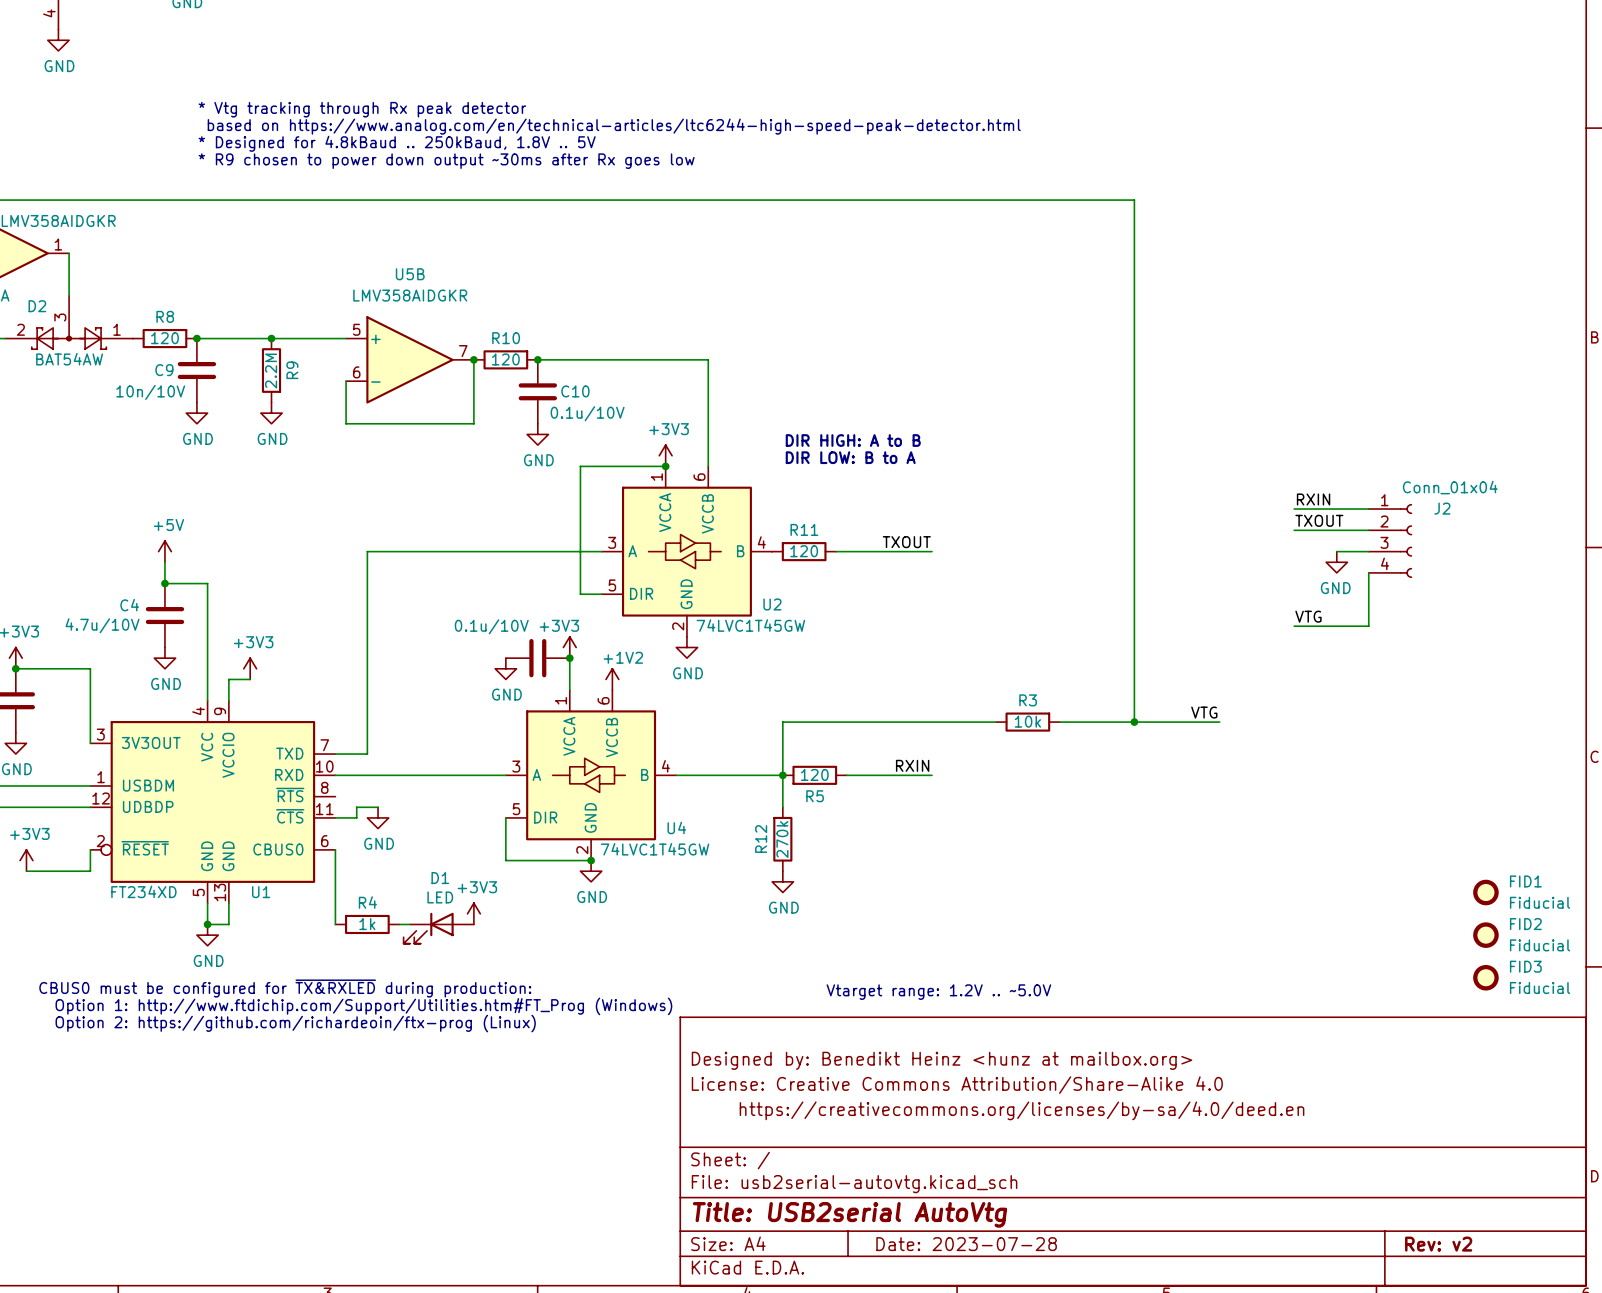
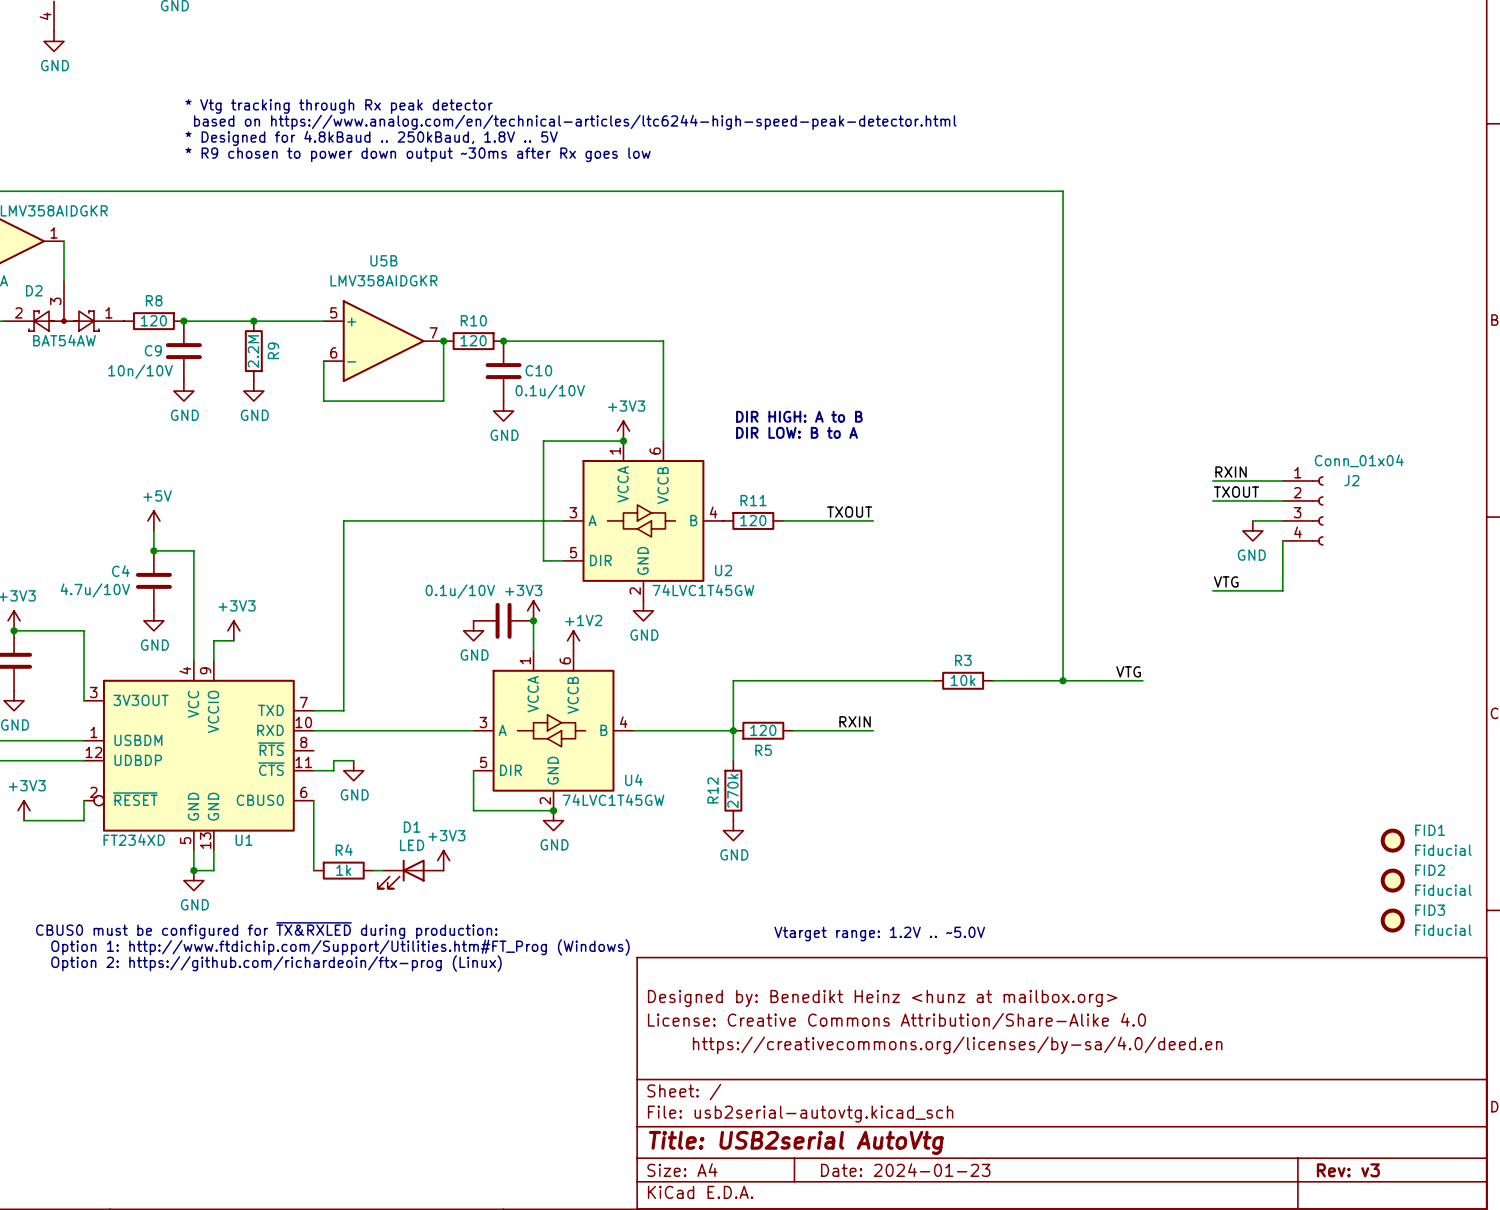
title block: Date: 2023-07-28 (966, 1244) -> Date: 2024-01-23 (905, 1170)
title block: Rev: v2 (1438, 1244) -> Rev: v3 (1348, 1170)

